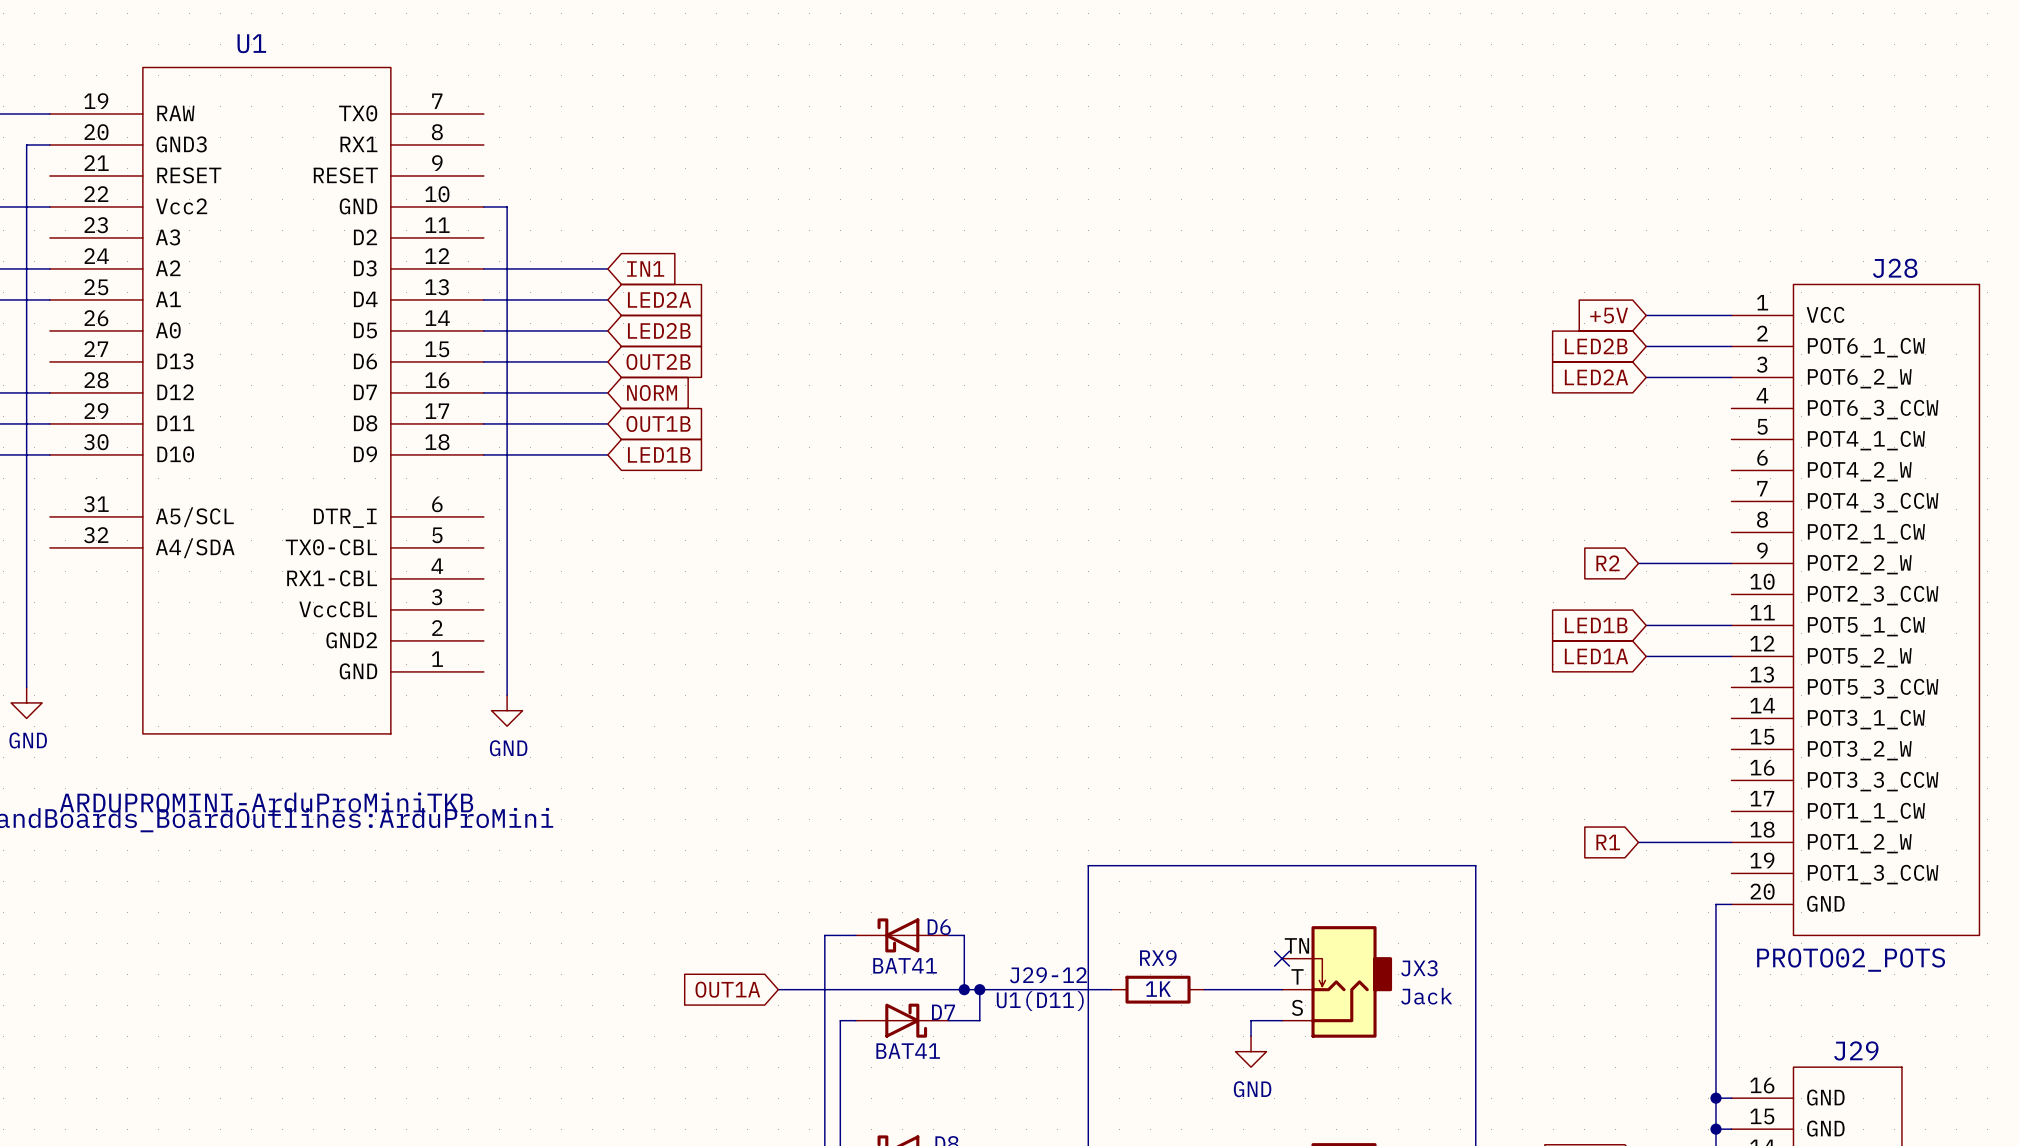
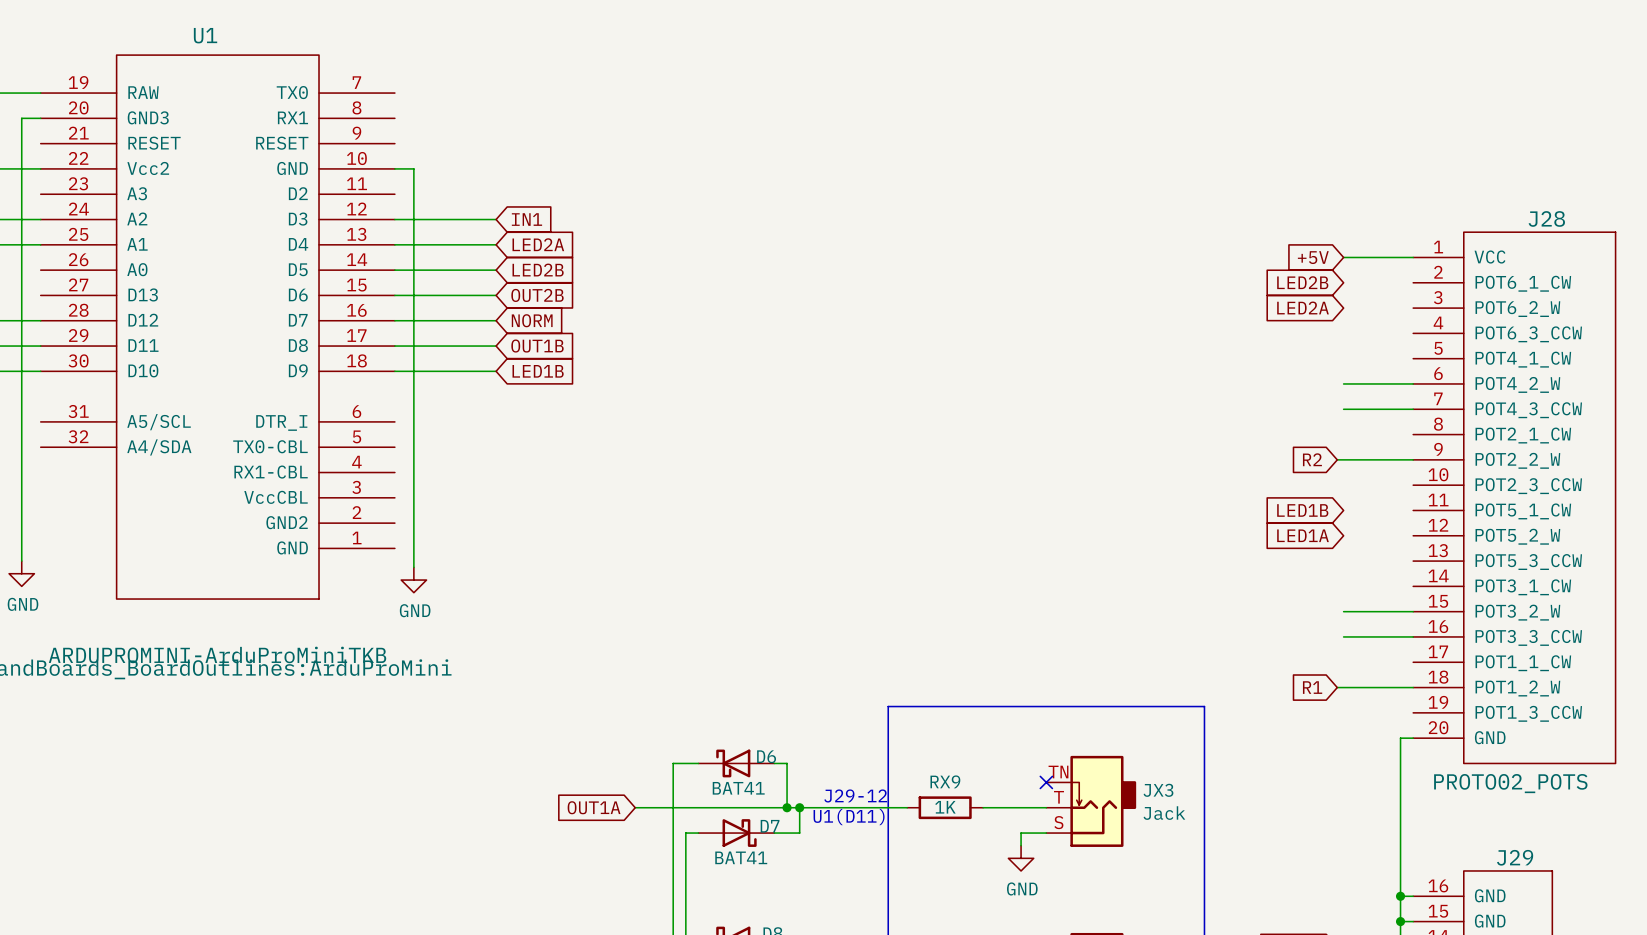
wire: (1646, 346) (1731, 346) -> (1343, 383) (1413, 383)
wire: (1646, 377) (1731, 377) -> (1343, 409) (1413, 409)
wire: (1646, 625) (1731, 625) -> (1343, 611) (1413, 611)
wire: (1646, 656) (1731, 656) -> (1343, 636) (1413, 636)

